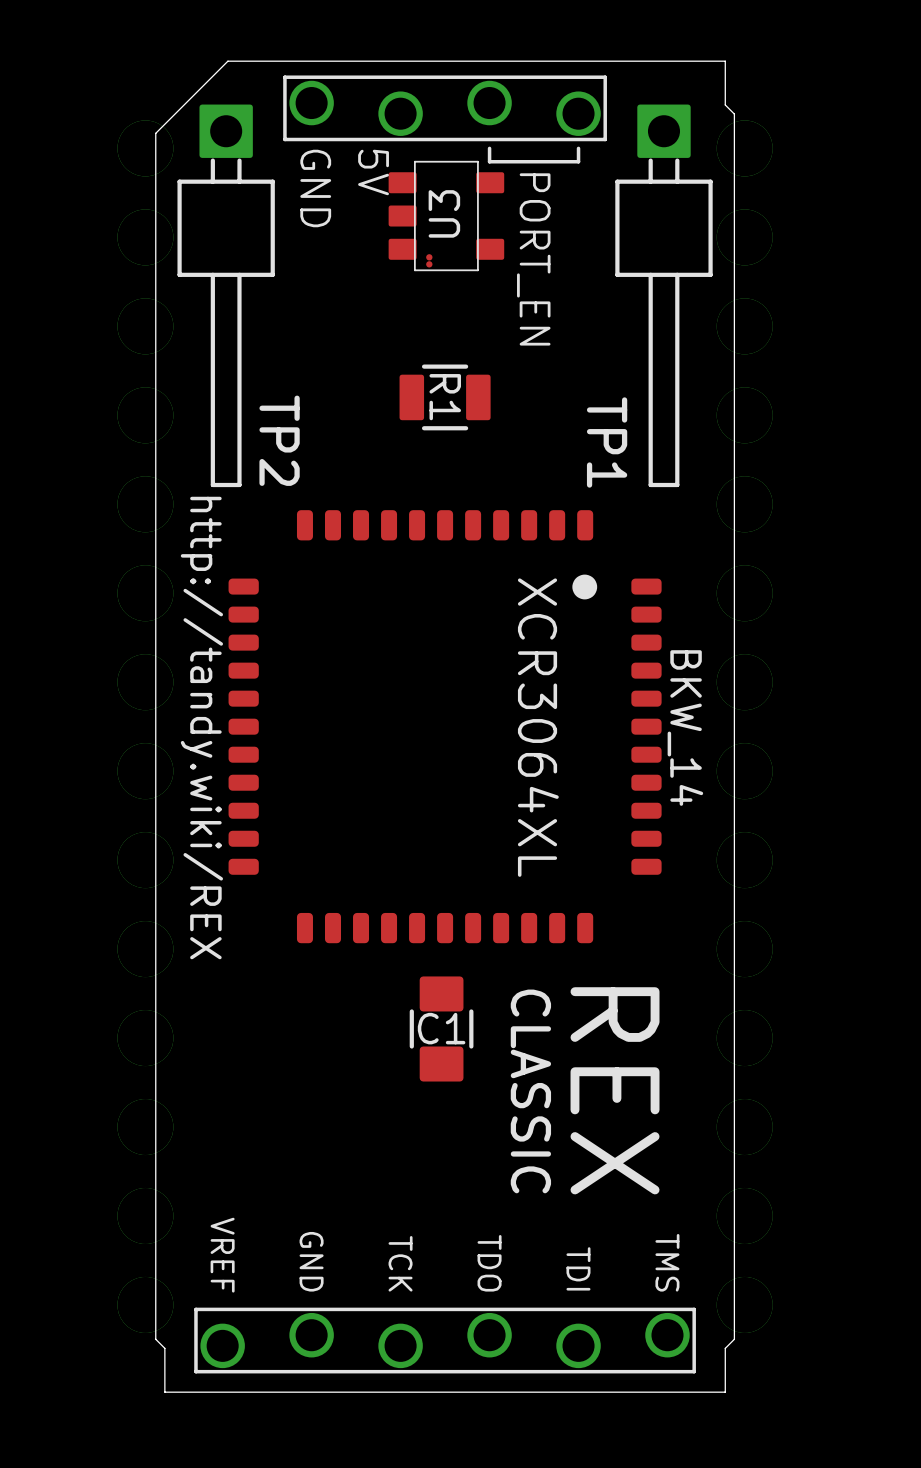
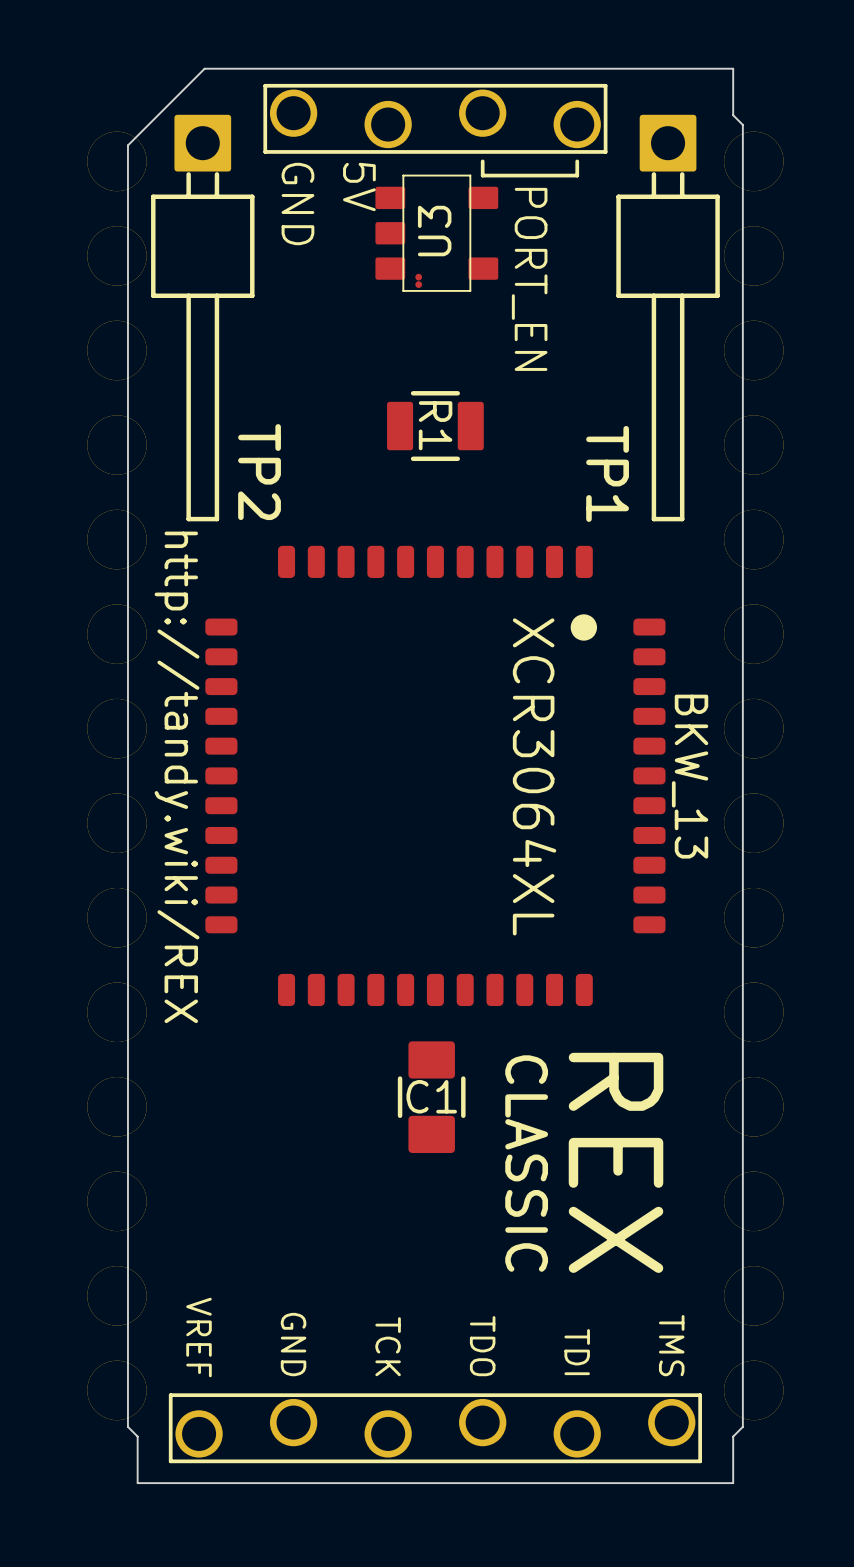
text: BKW_14 (685, 728) -> BKW_13 (690, 776)

